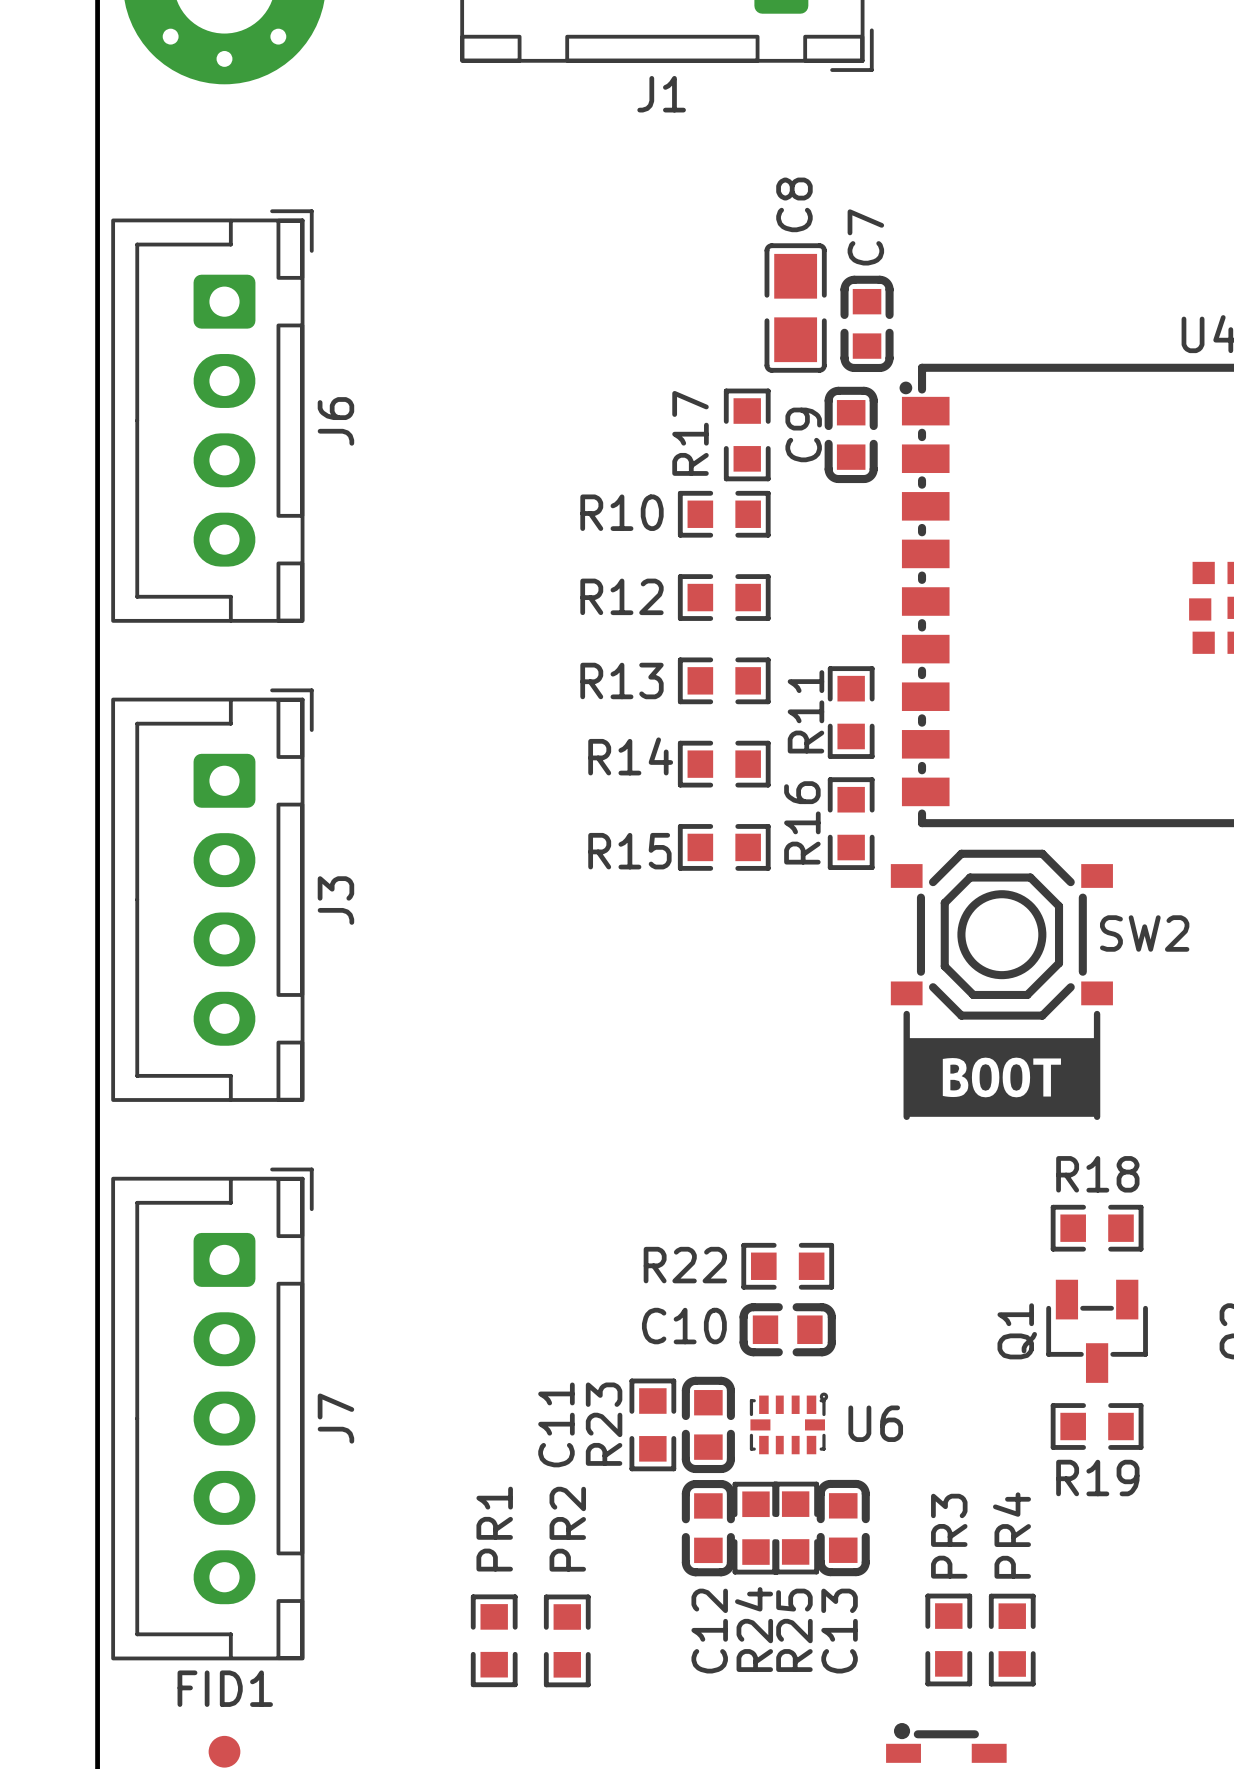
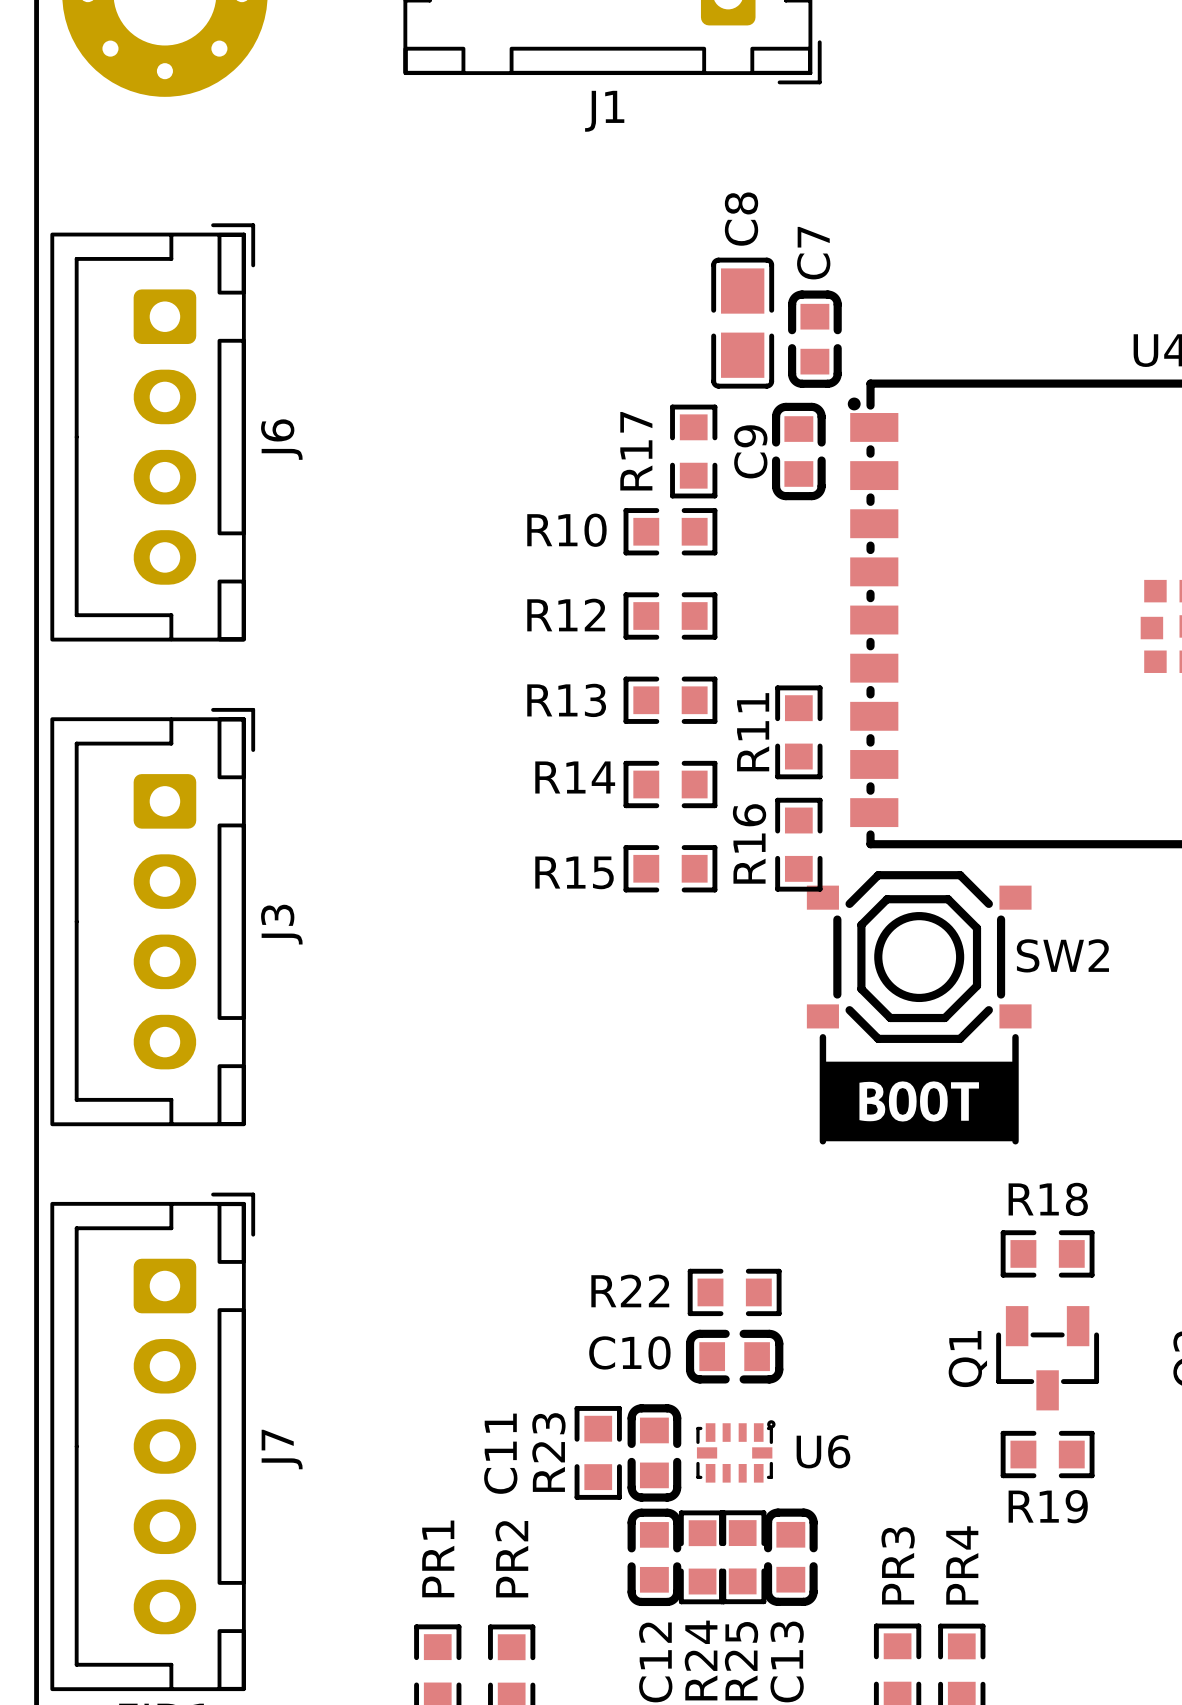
SW2 position: (1001, 934) -> (919, 957)
line: (906, 1014) (906, 1116) -> (822, 1037) (822, 1141)
line: (1097, 1014) (1097, 1116) -> (1015, 1037) (1015, 1141)
drawing position: (1001, 1077) -> (919, 1101)

